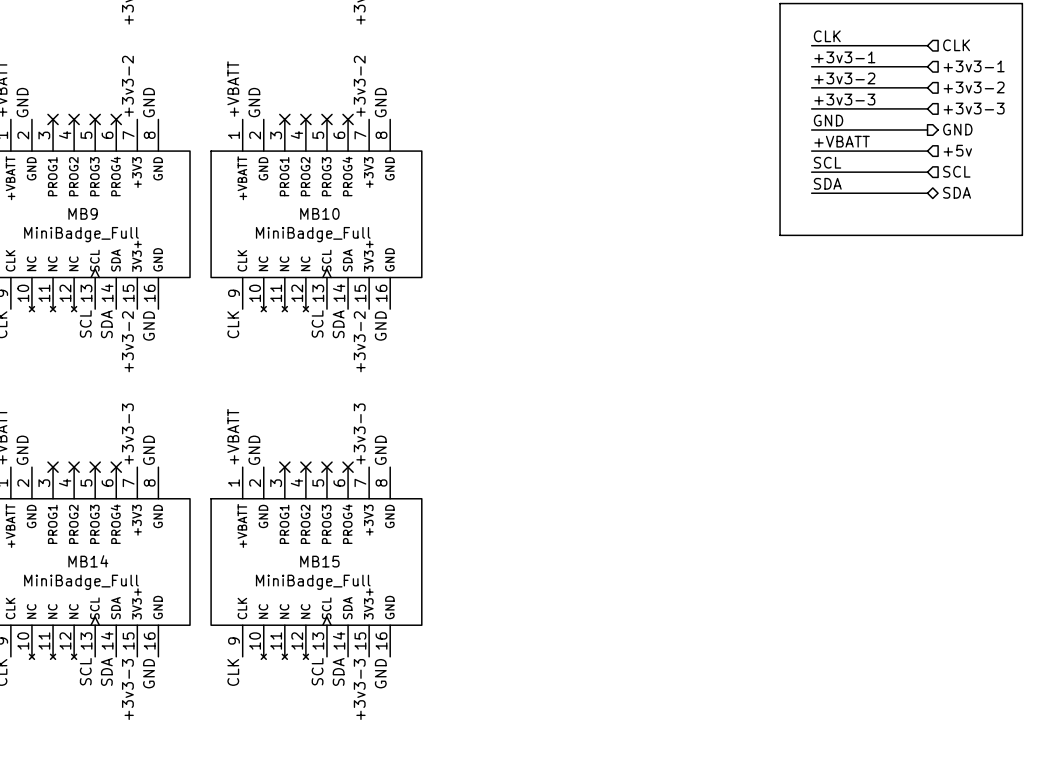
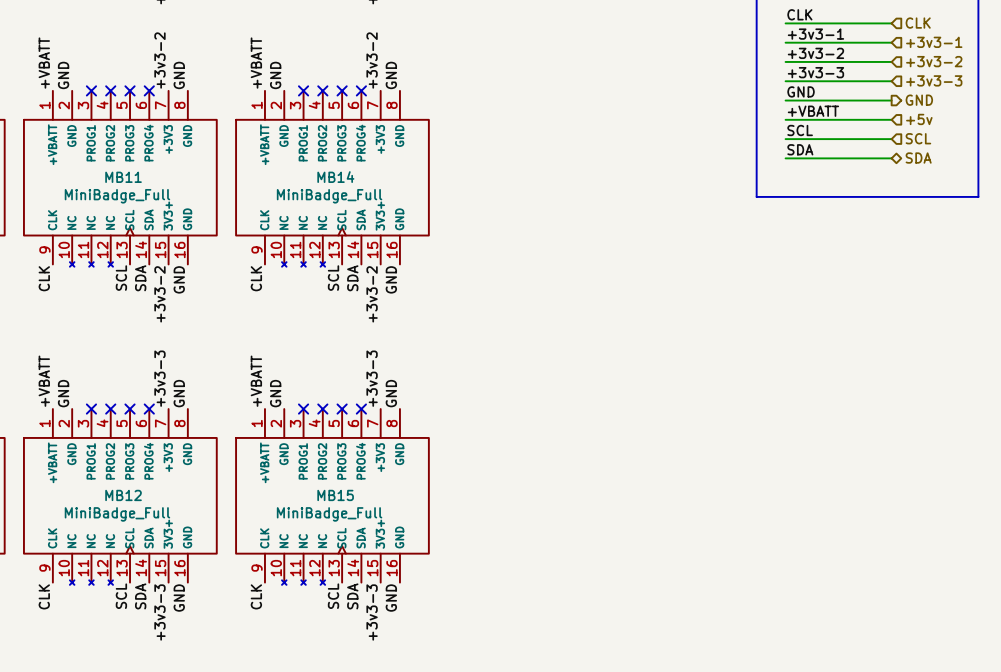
MB9 name: MB9 (83, 213) -> MB11 (123, 177)
MB10 name: MB10 (319, 213) -> MB14 (335, 177)
MB14 name: MB14 (88, 561) -> MB12 (123, 495)

